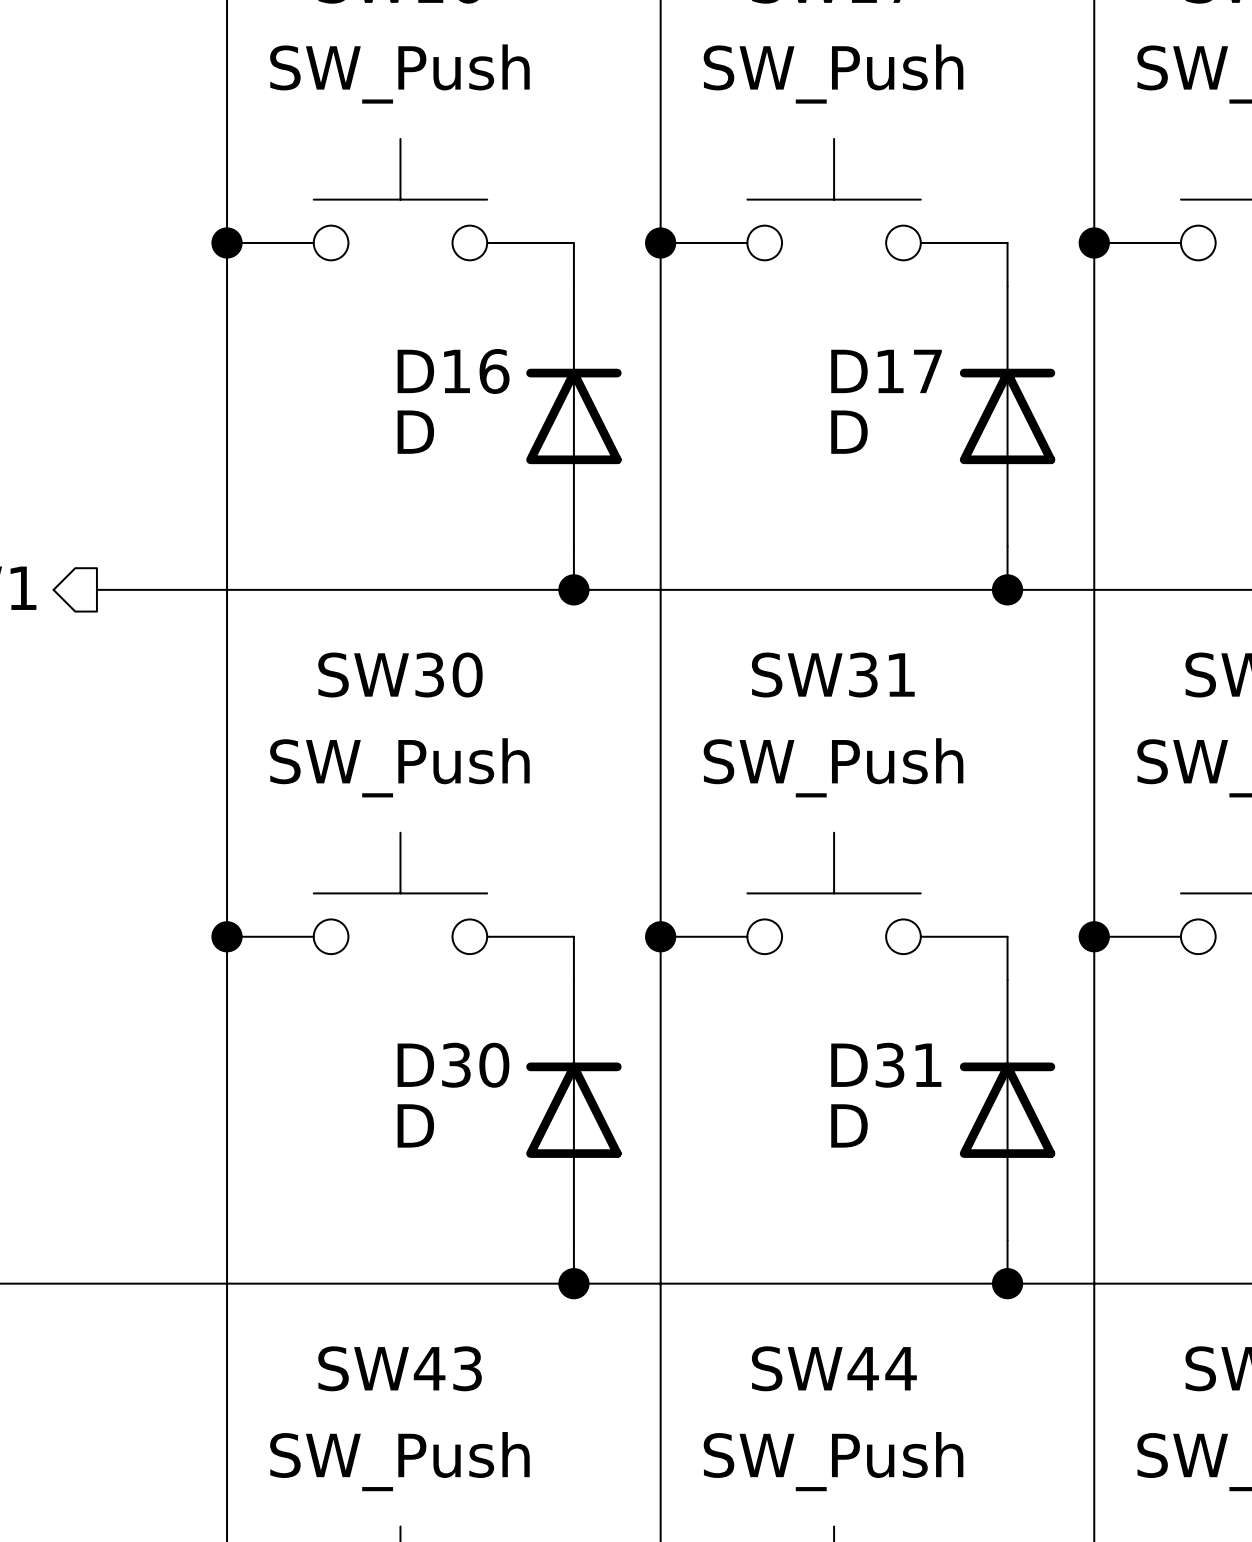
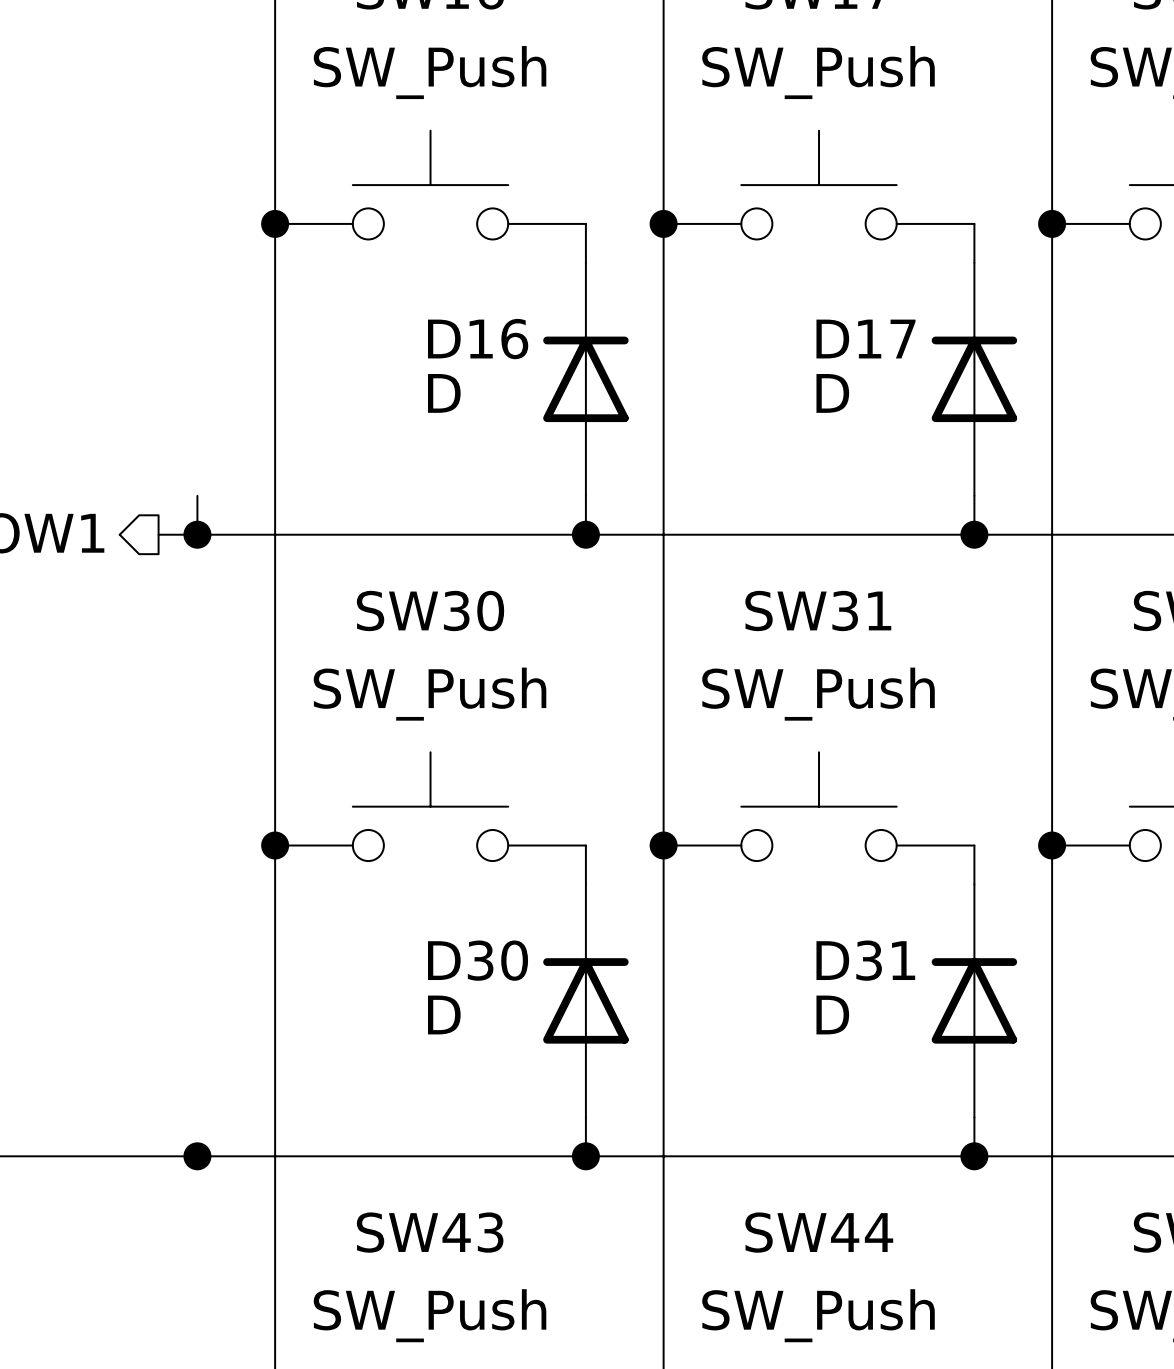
wire: none -> (197, 495) (197, 534)
junction: none -> (197, 534)
junction: none -> (197, 1156)

